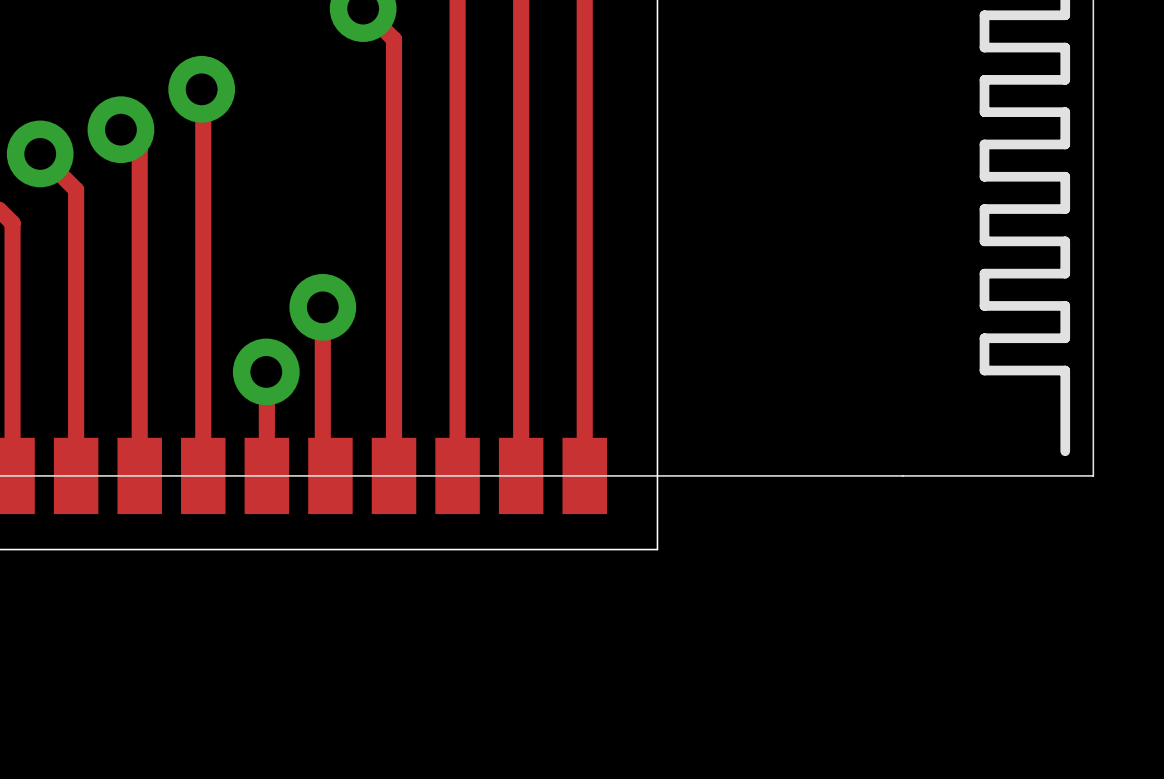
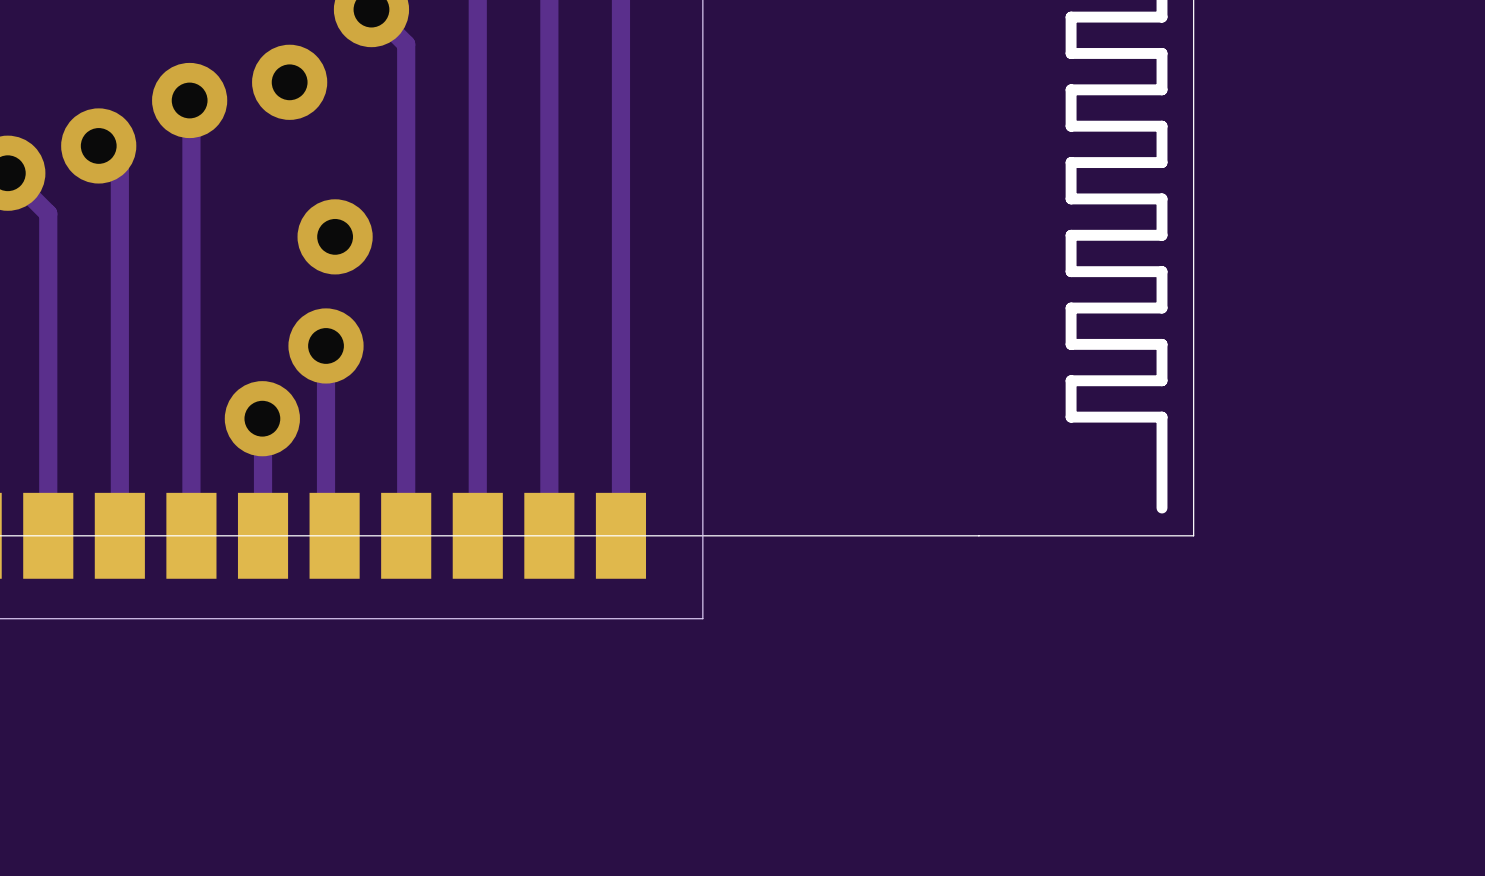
via: none -> (289, 82)
via: none -> (335, 236)

